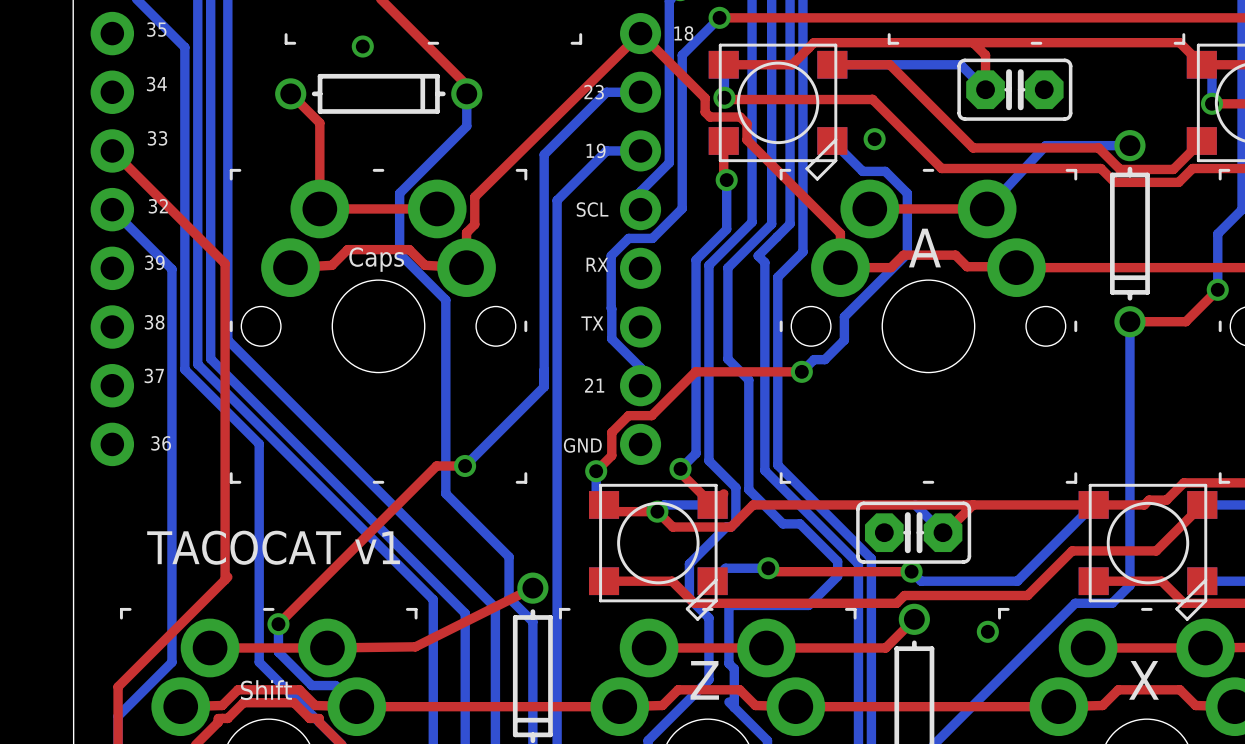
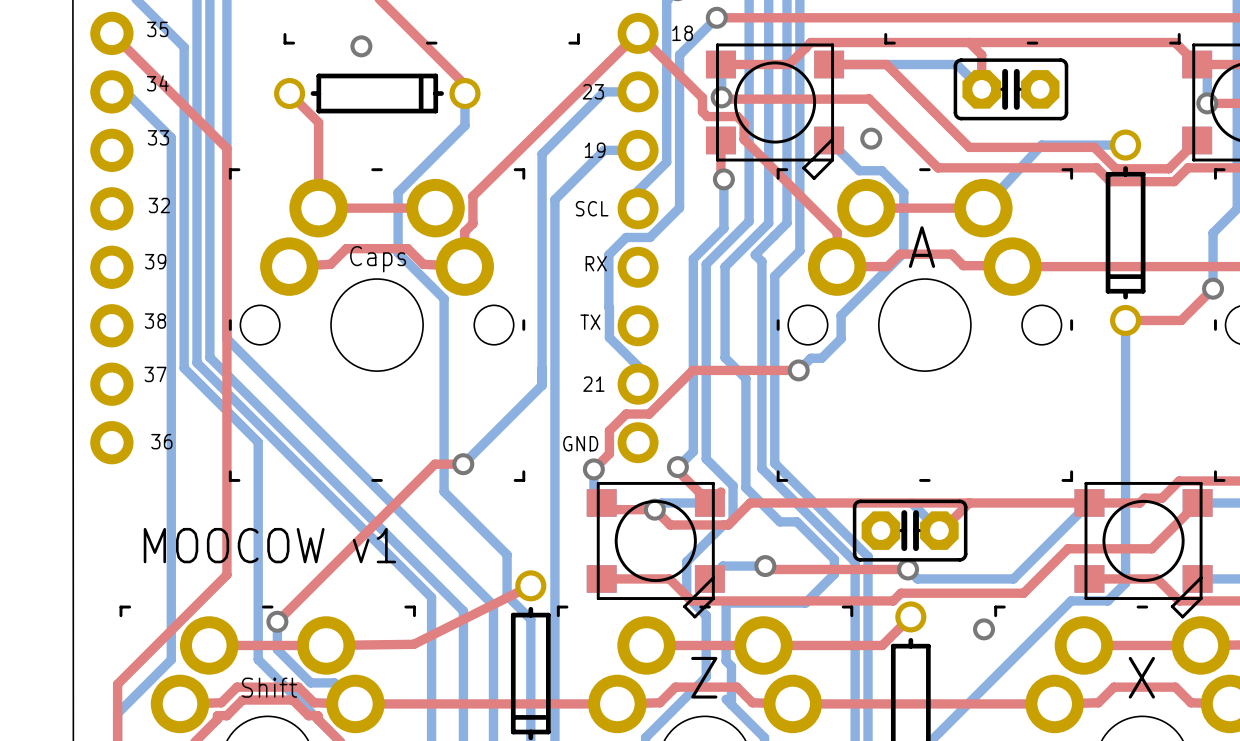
top track: none -> (111, 33) (226, 148) (226, 574)
top track: (112, 150) (225, 263) (225, 579) -> none
bottom track: (112, 209) (171, 269) -> (111, 91) (125, 91) (171, 137) (171, 268)
text: TACOCAT v1 (273, 547) -> MOOCOW v1 (269, 545)

